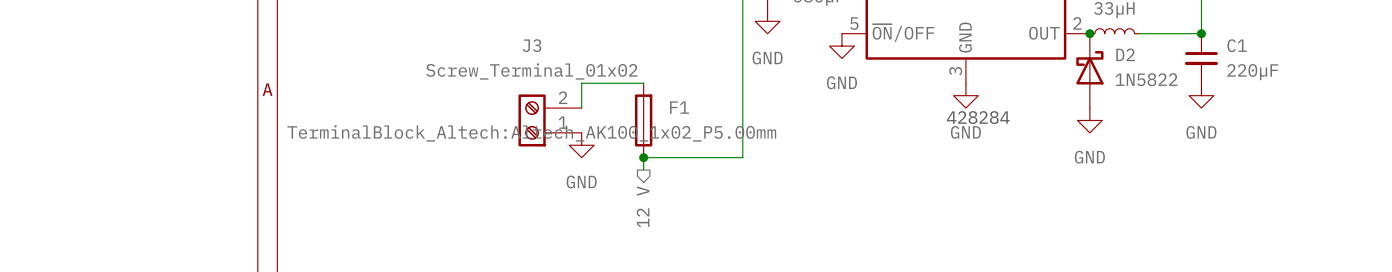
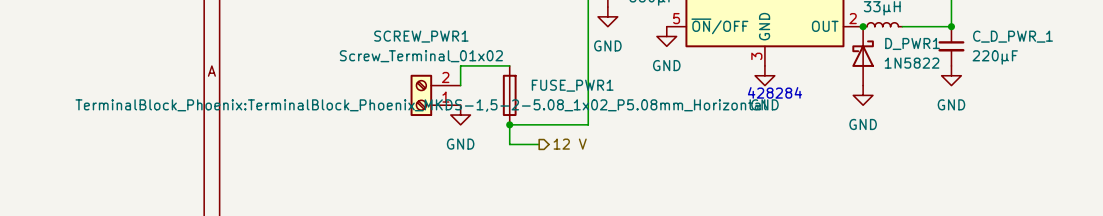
J3 name: J3 (532, 45) -> SCREW_PWR1 (421, 36)
C1 name: C1 (1237, 45) -> C_D_PWR_1 (1013, 36)
D2 name: D2 (1125, 54) -> D_PWR1 (912, 43)
F1 name: F1 (679, 107) -> FUSE_PWR1 (572, 85)
J3 text: TerminalBlock_Altech:Altech_AK100_1x02_P5.00mm (531, 133) -> TerminalBlock_Phoenix:TerminalBlock_Phoenix_MKDS-1,5-2-5.08_1x02_P5.08mm_Horizontal (421, 105)
wire: none -> (509, 134) (509, 144) (539, 144)
hierarchical label rotation: 0° (643, 206) -> 90° counterclockwise (570, 144)
hierarchical label position: 12 V (643, 206) -> 12 V (570, 144)

